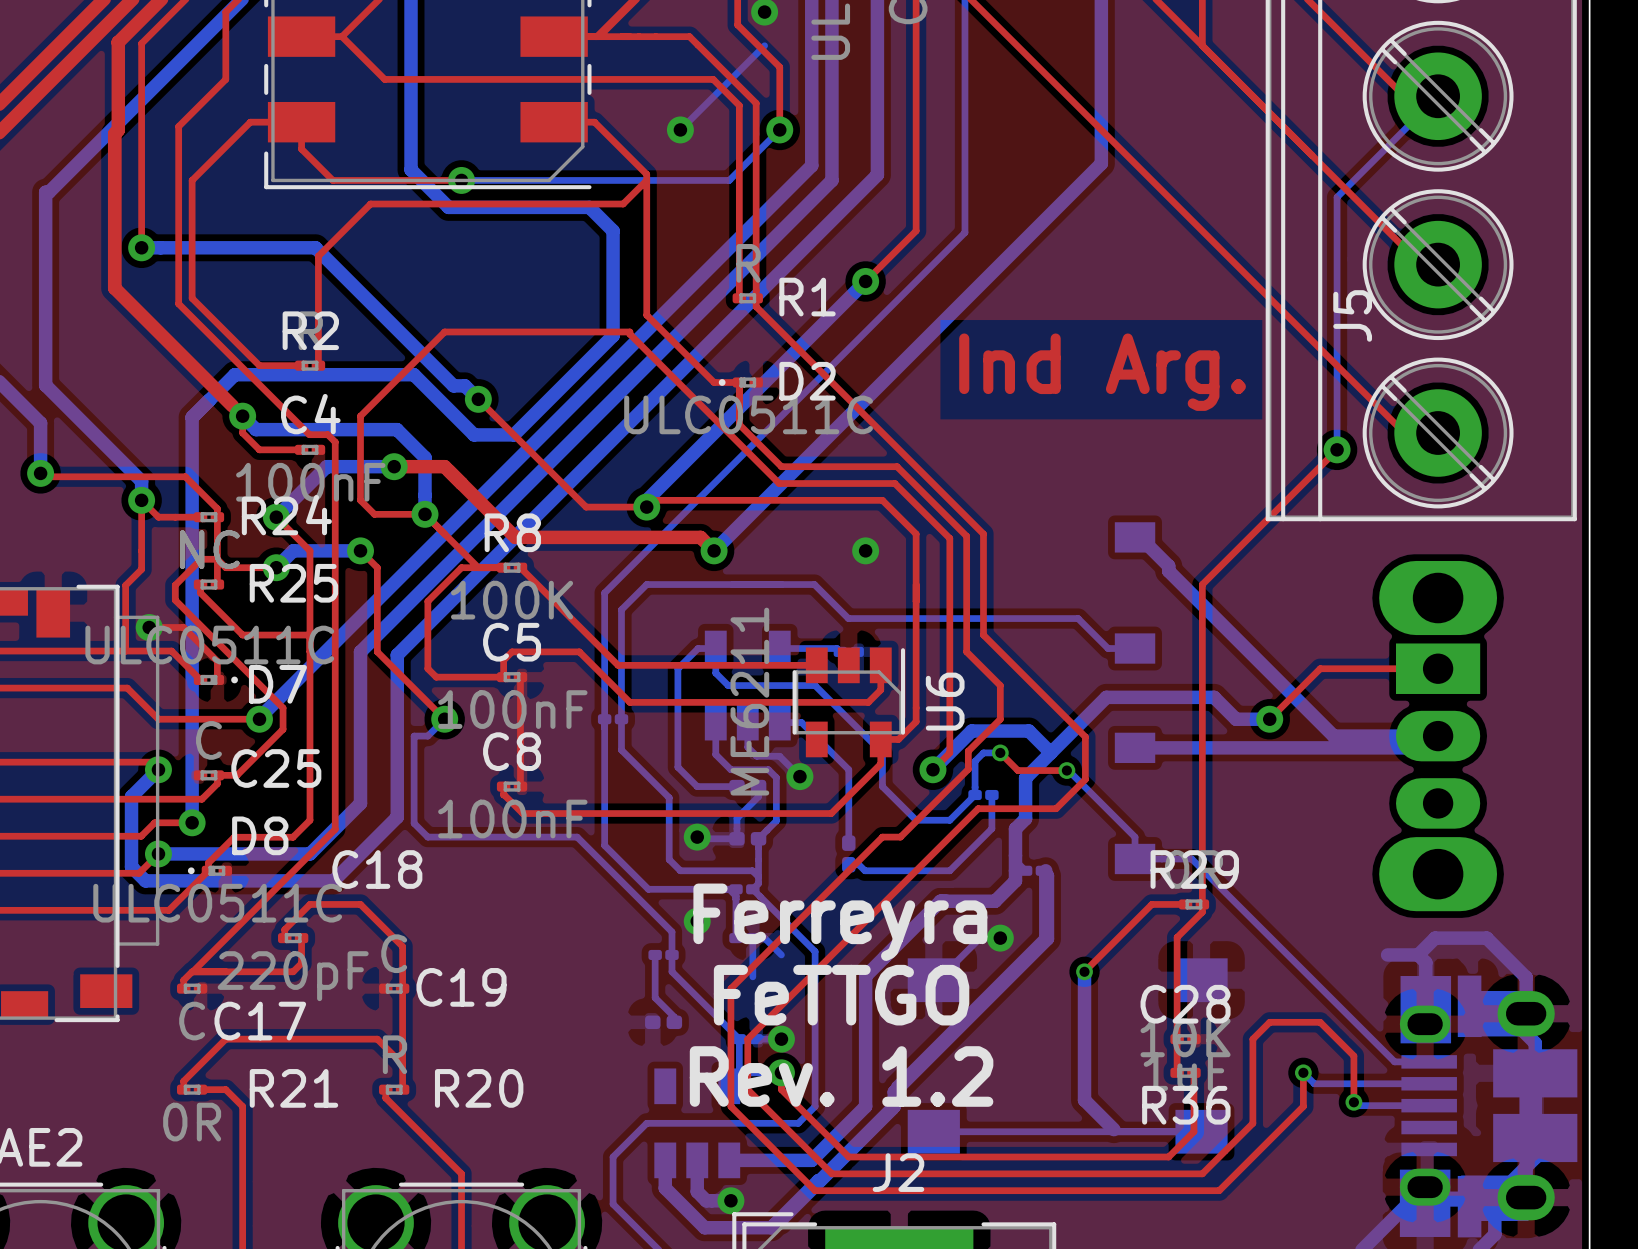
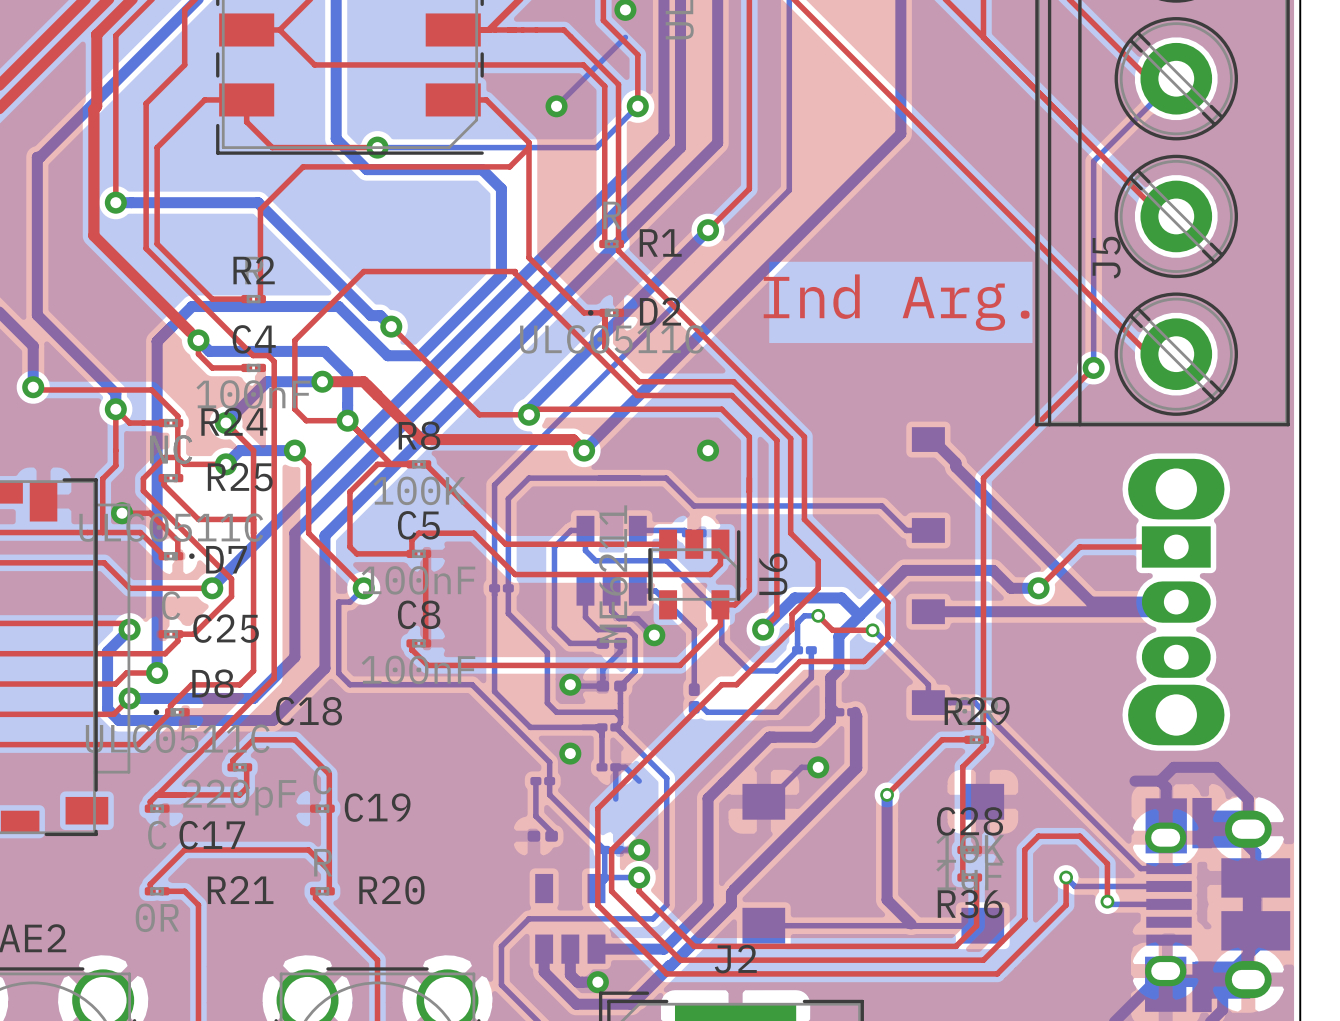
text: Ferreyra (840, 922) -> none
text: FeTTGO (841, 995) -> none
text: Rev. 1.2 (841, 1076) -> none

